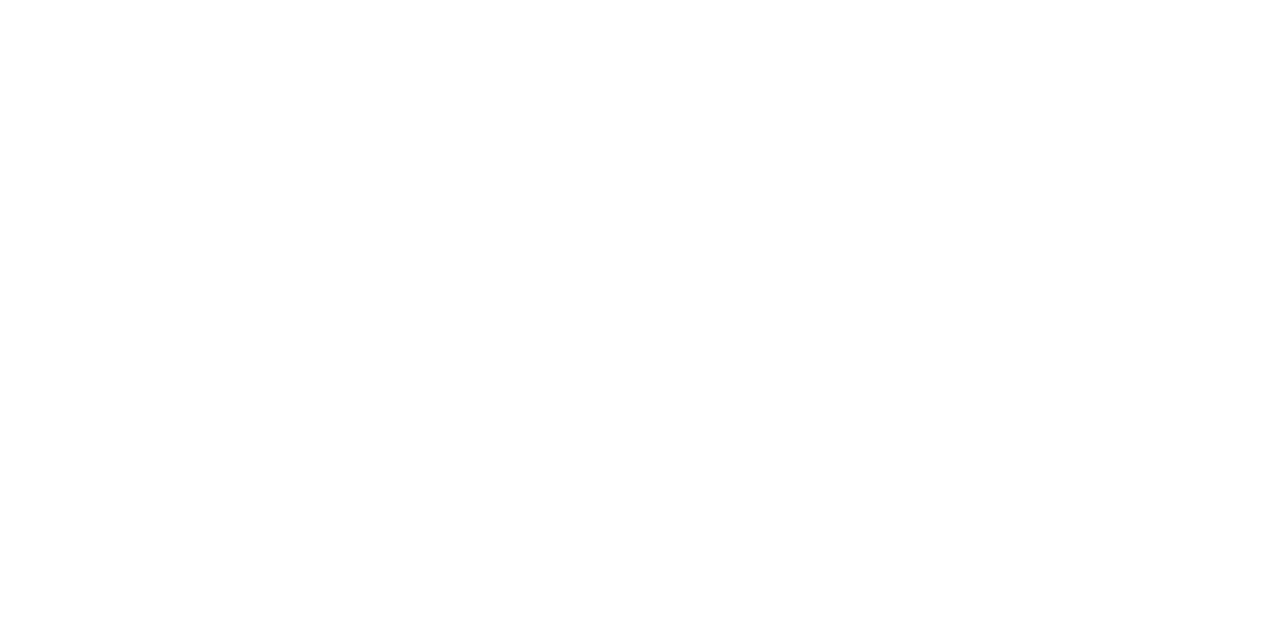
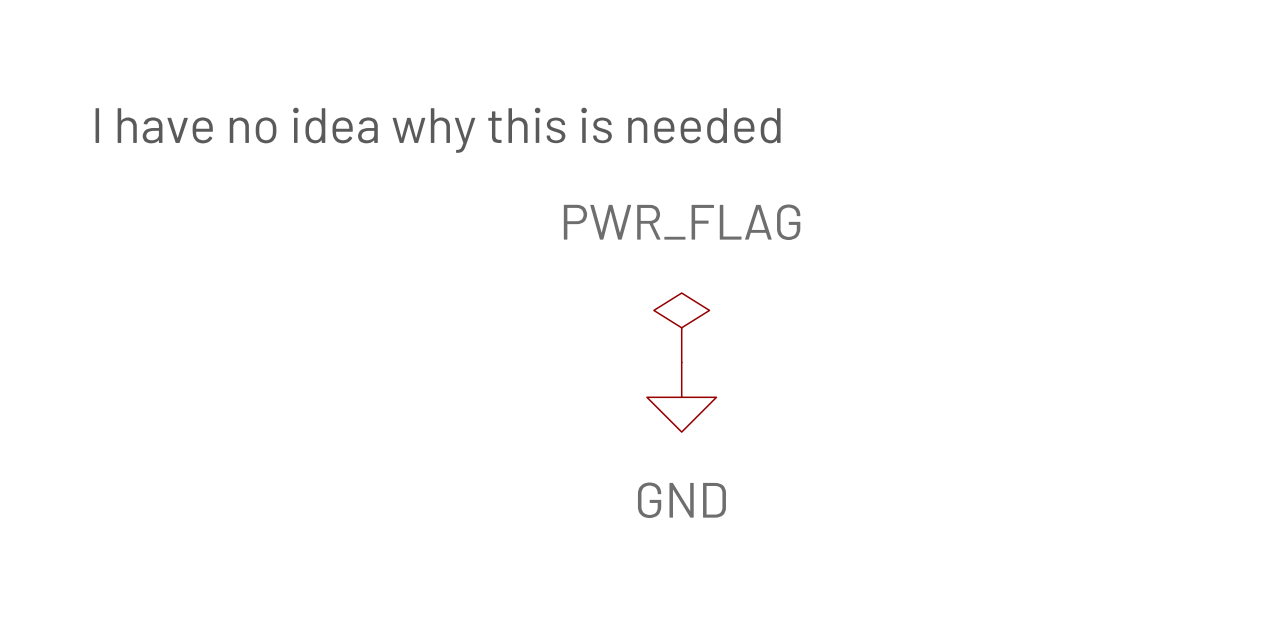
text: none -> I have no idea why this is needed (438, 130)
power symbol: none -> PWR_FLAG (681, 327)
power symbol: none -> GND (681, 397)

